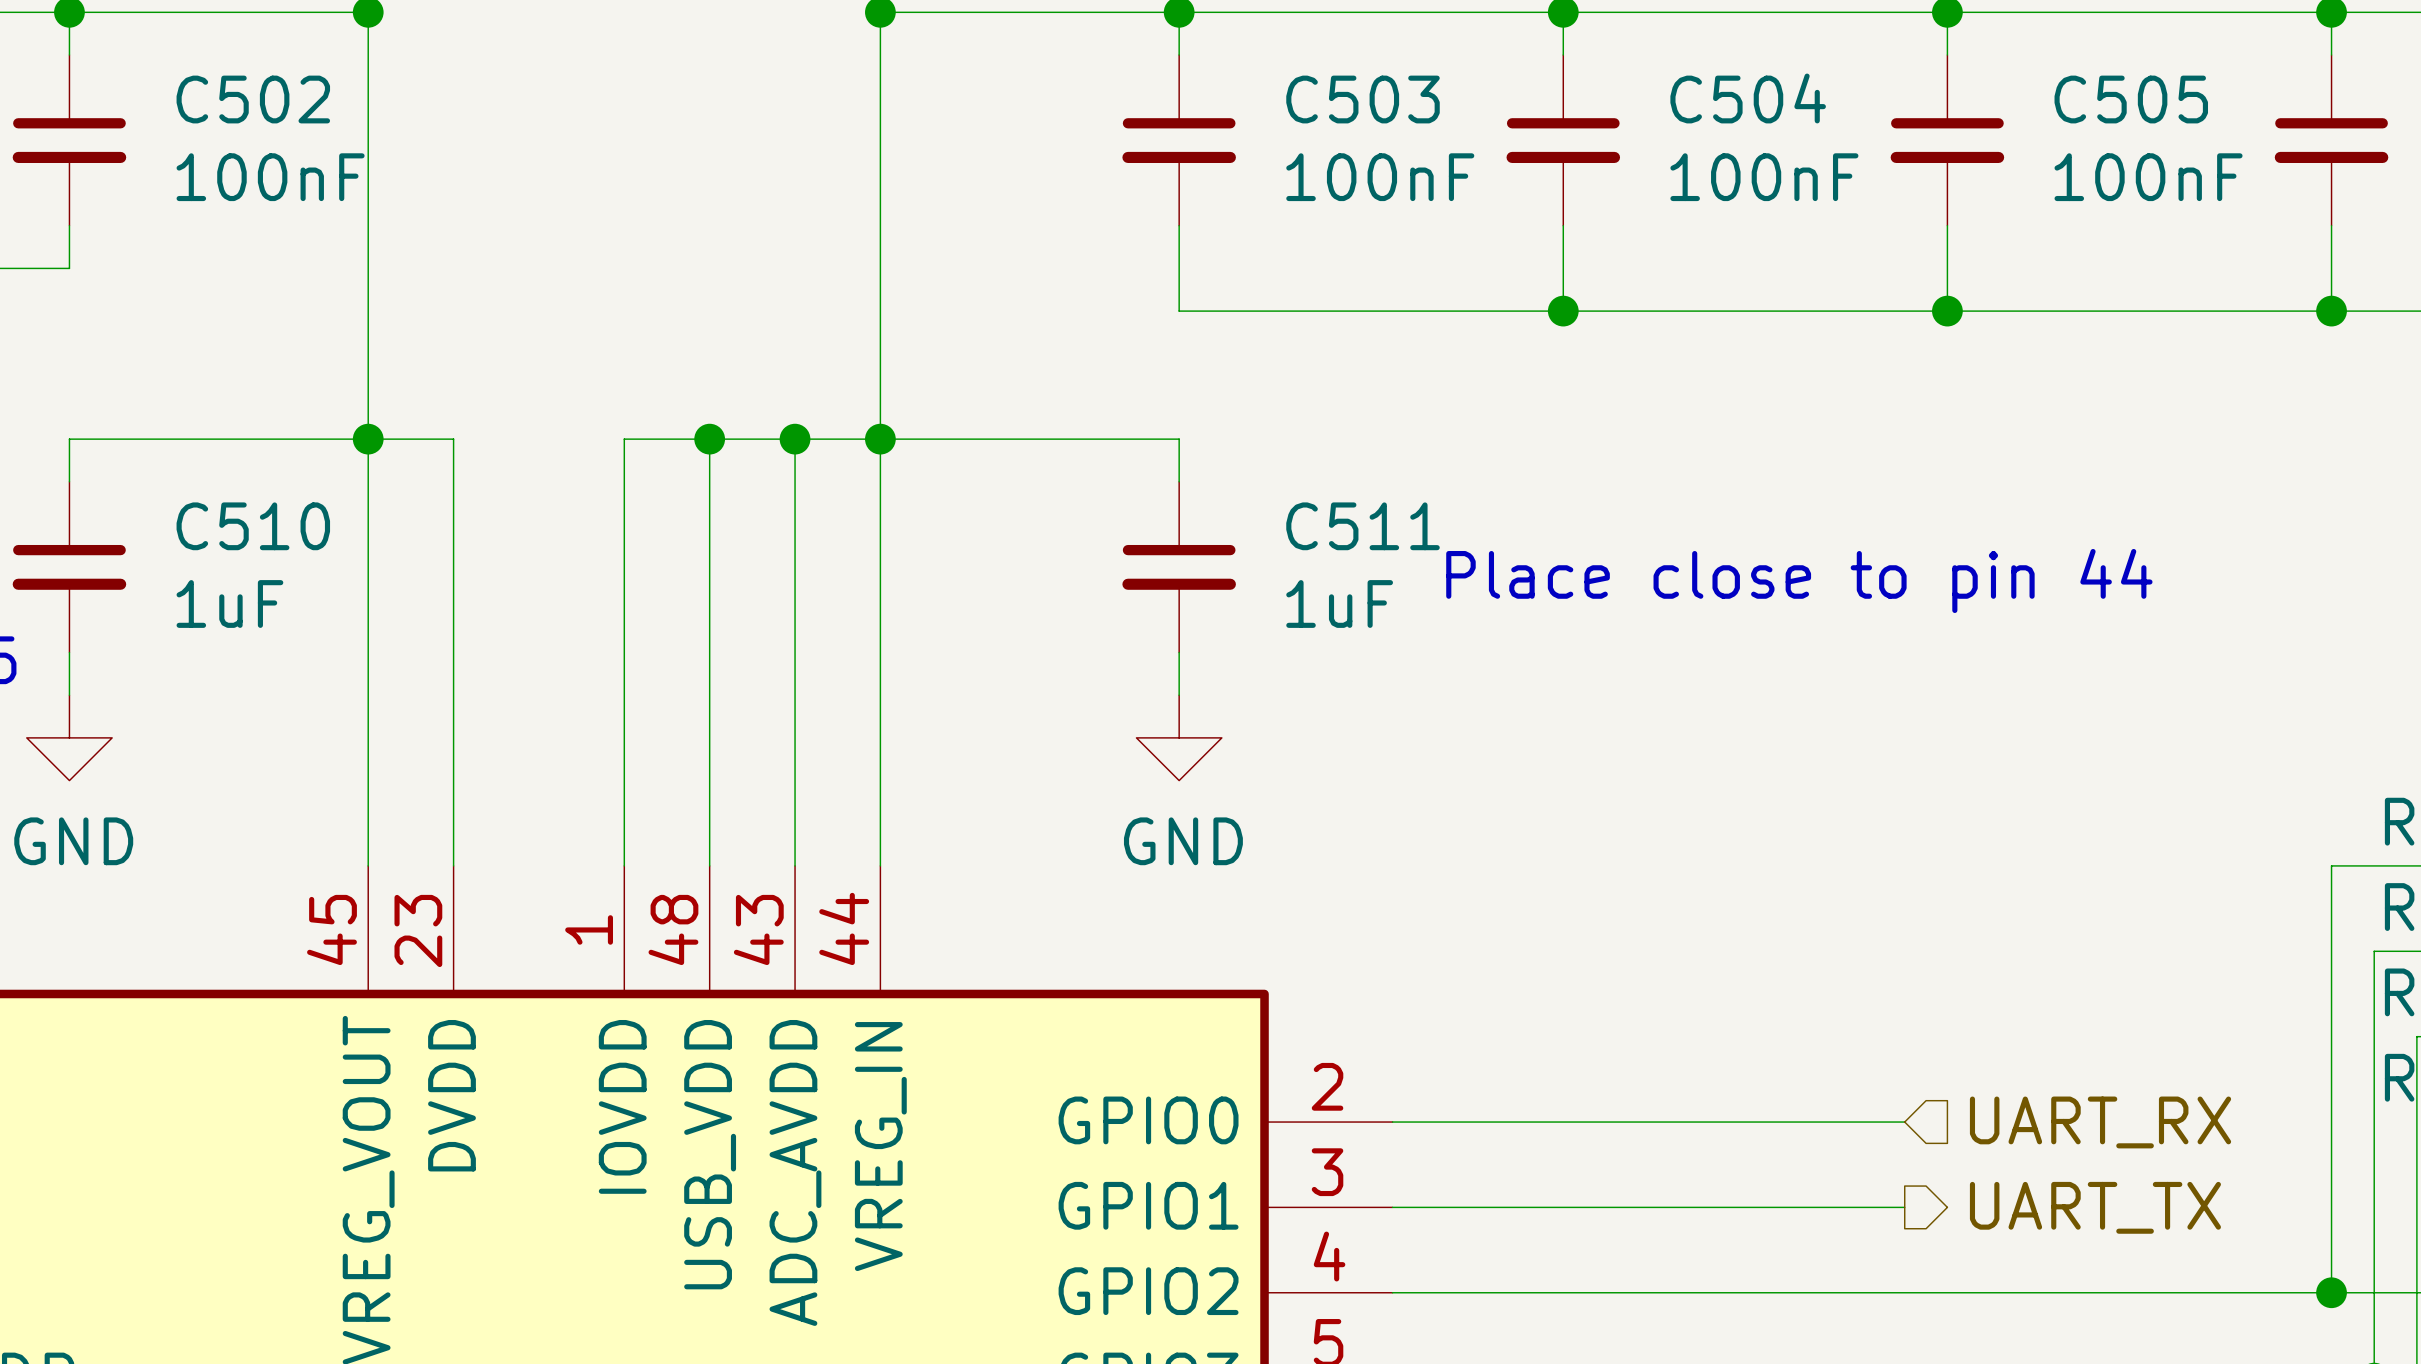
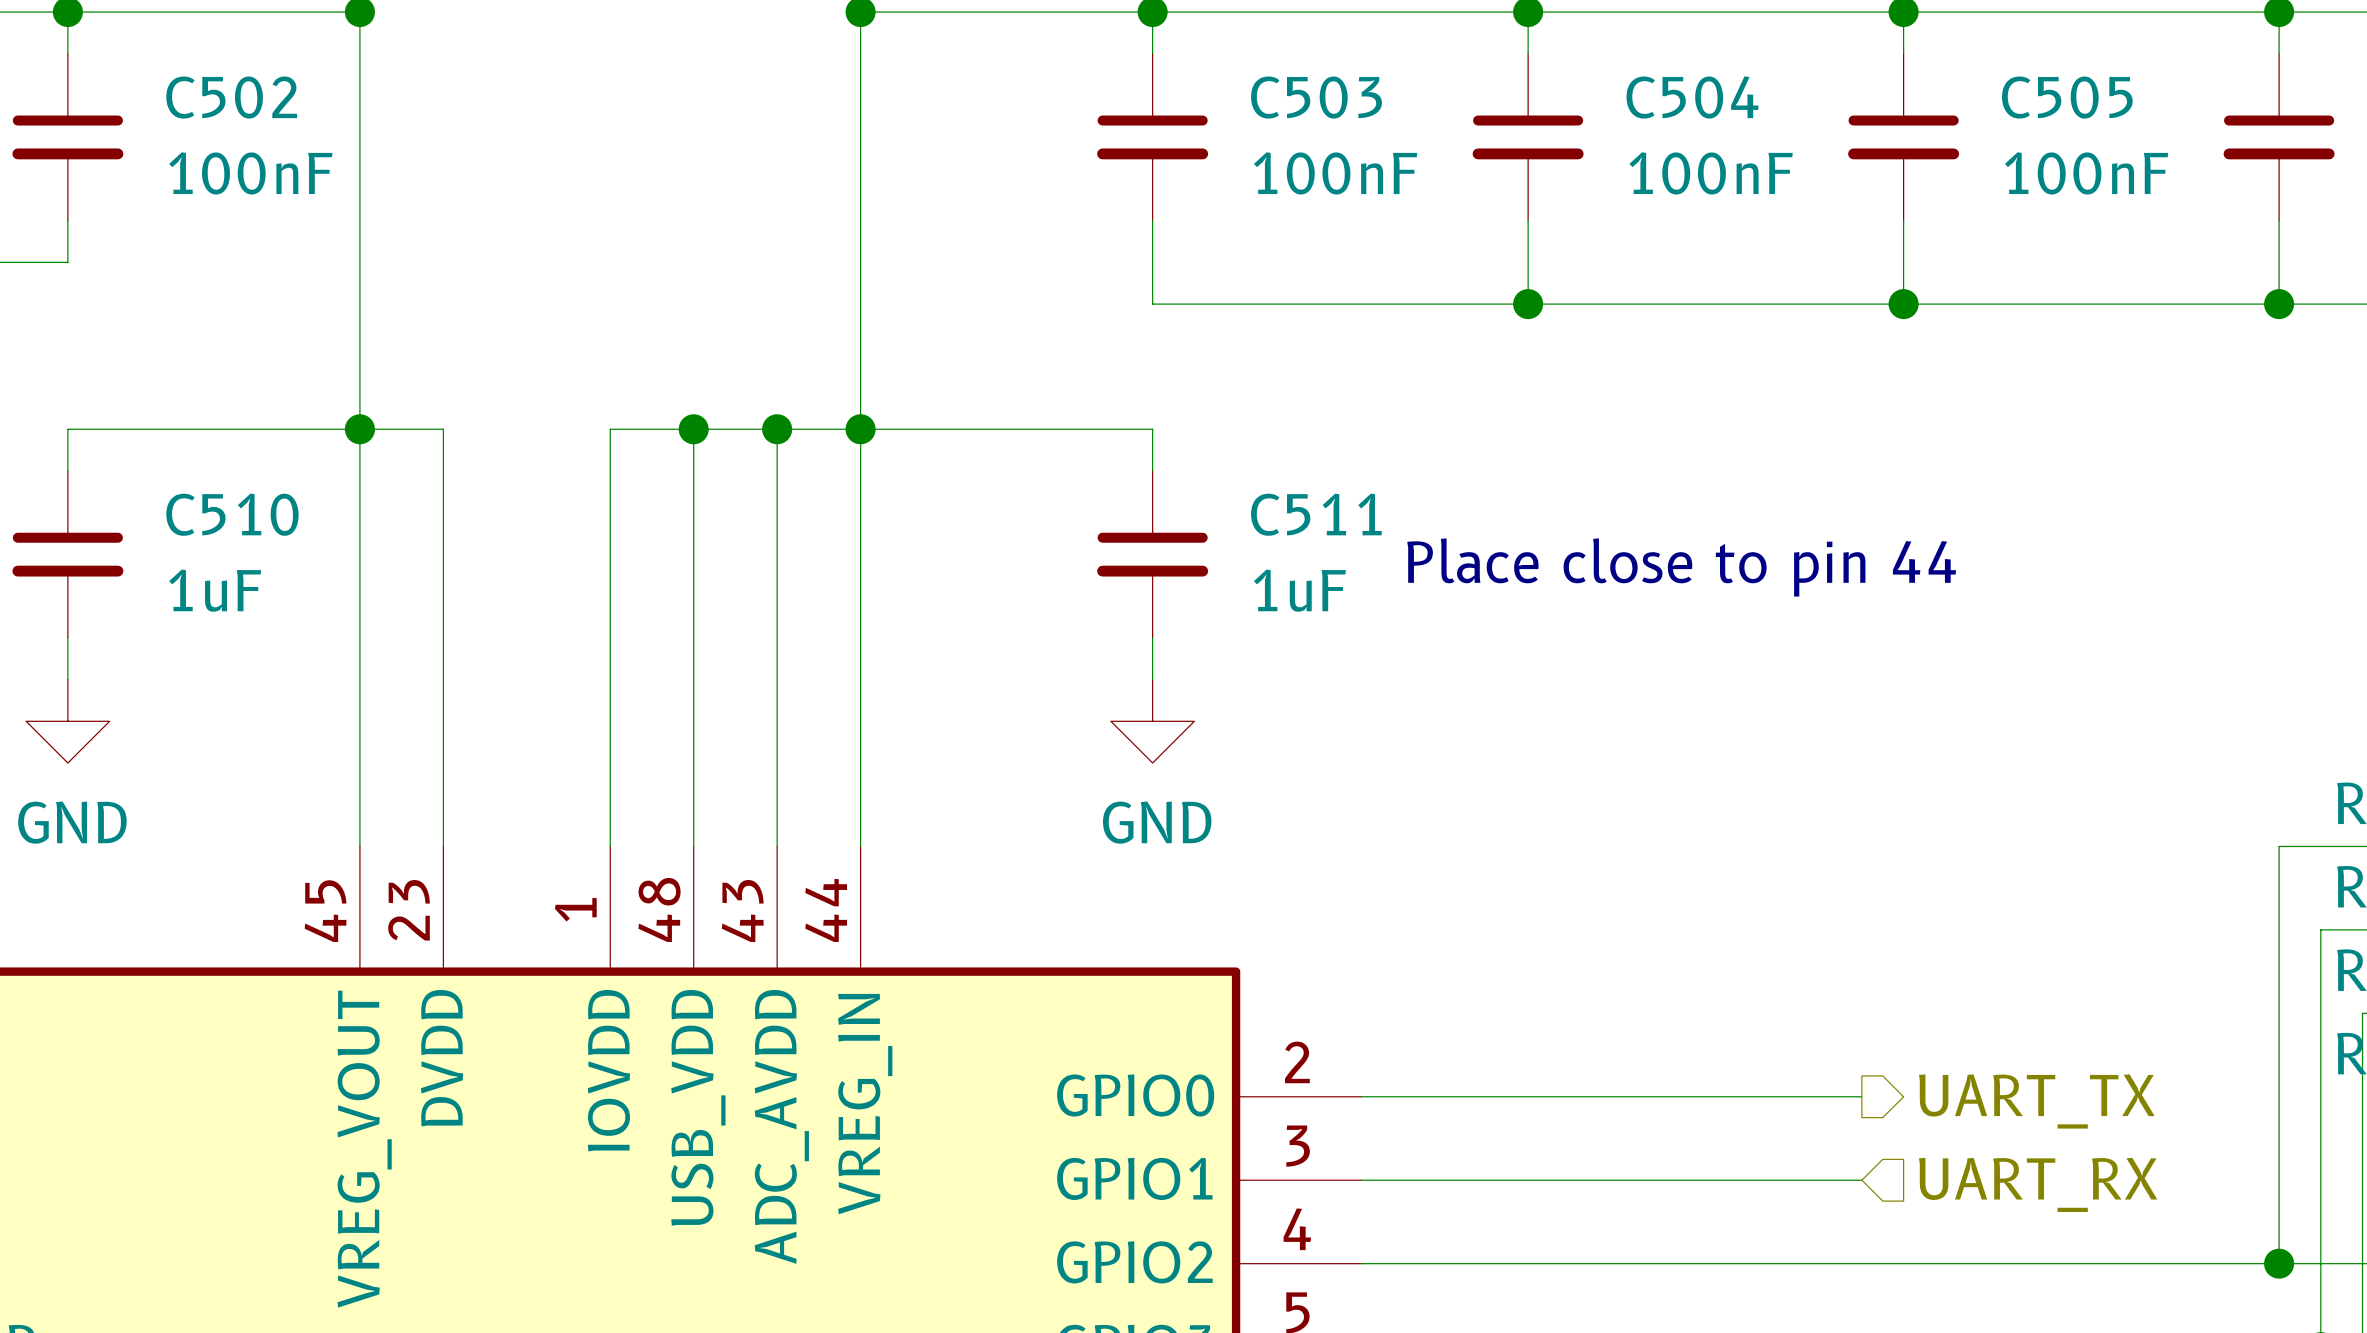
hierarchical label shape: input (2100, 1122) -> output (2036, 1101)
hierarchical label: UART_RX (2100, 1122) -> UART_TX (2036, 1101)
hierarchical label shape: output (2095, 1207) -> input (2038, 1184)
hierarchical label: UART_TX (2095, 1207) -> UART_RX (2038, 1184)

